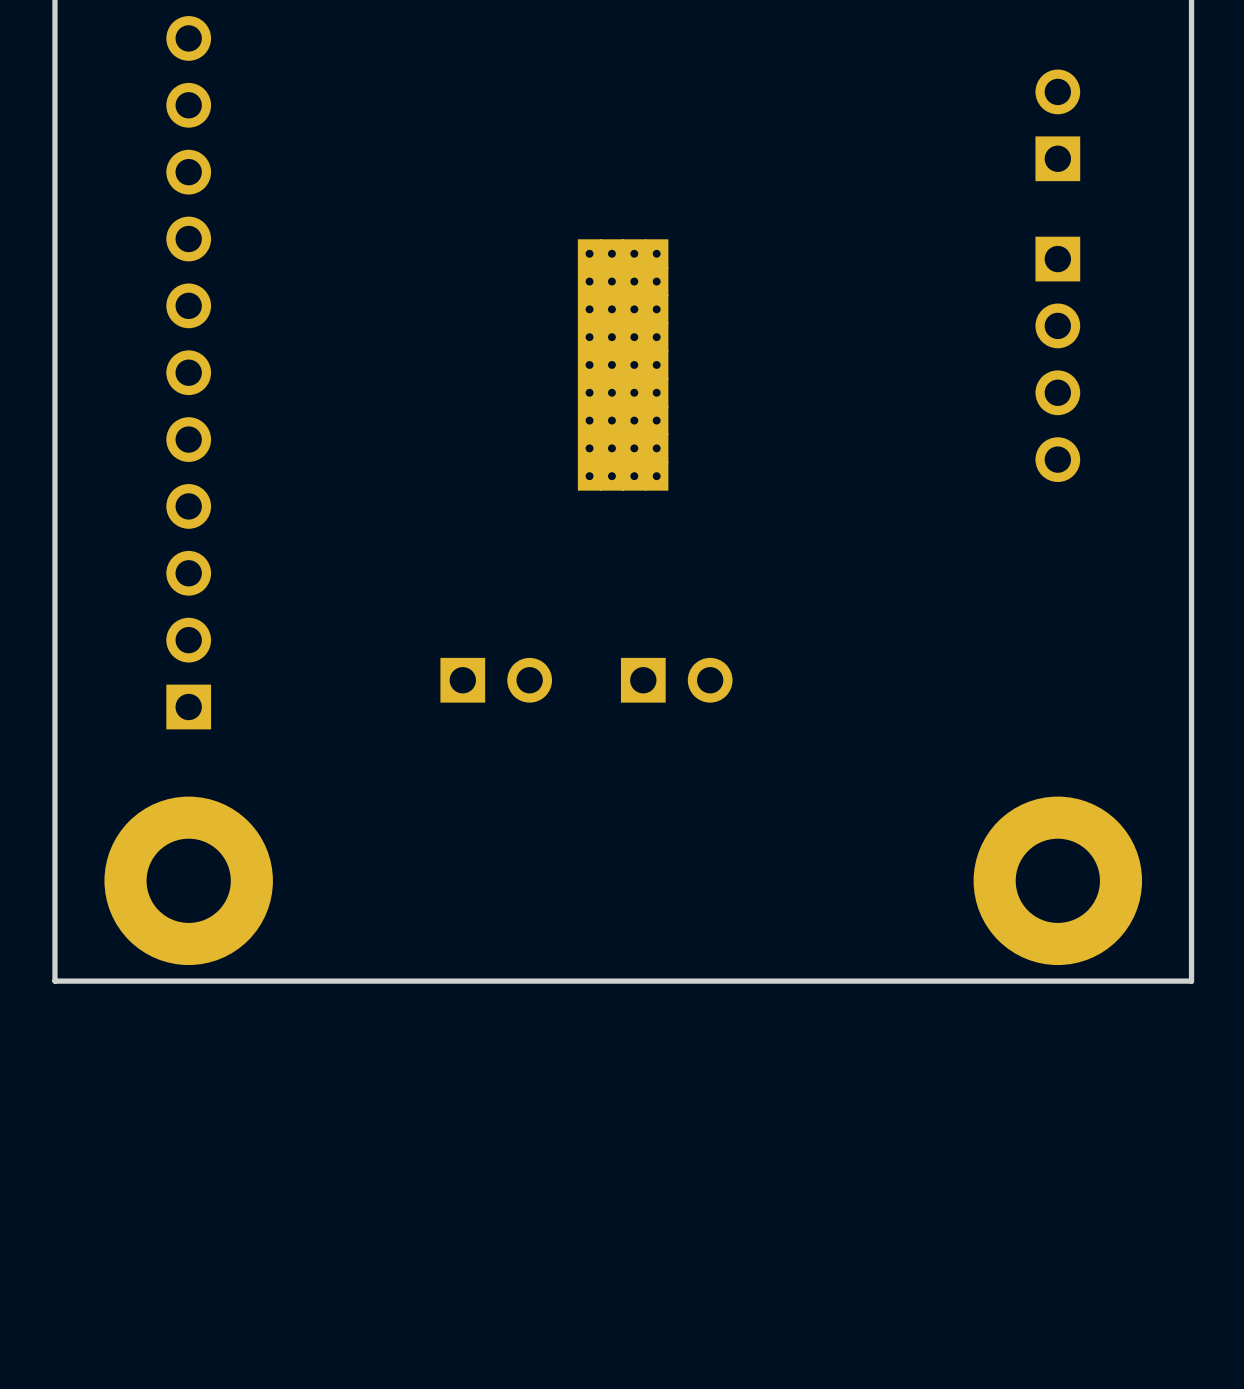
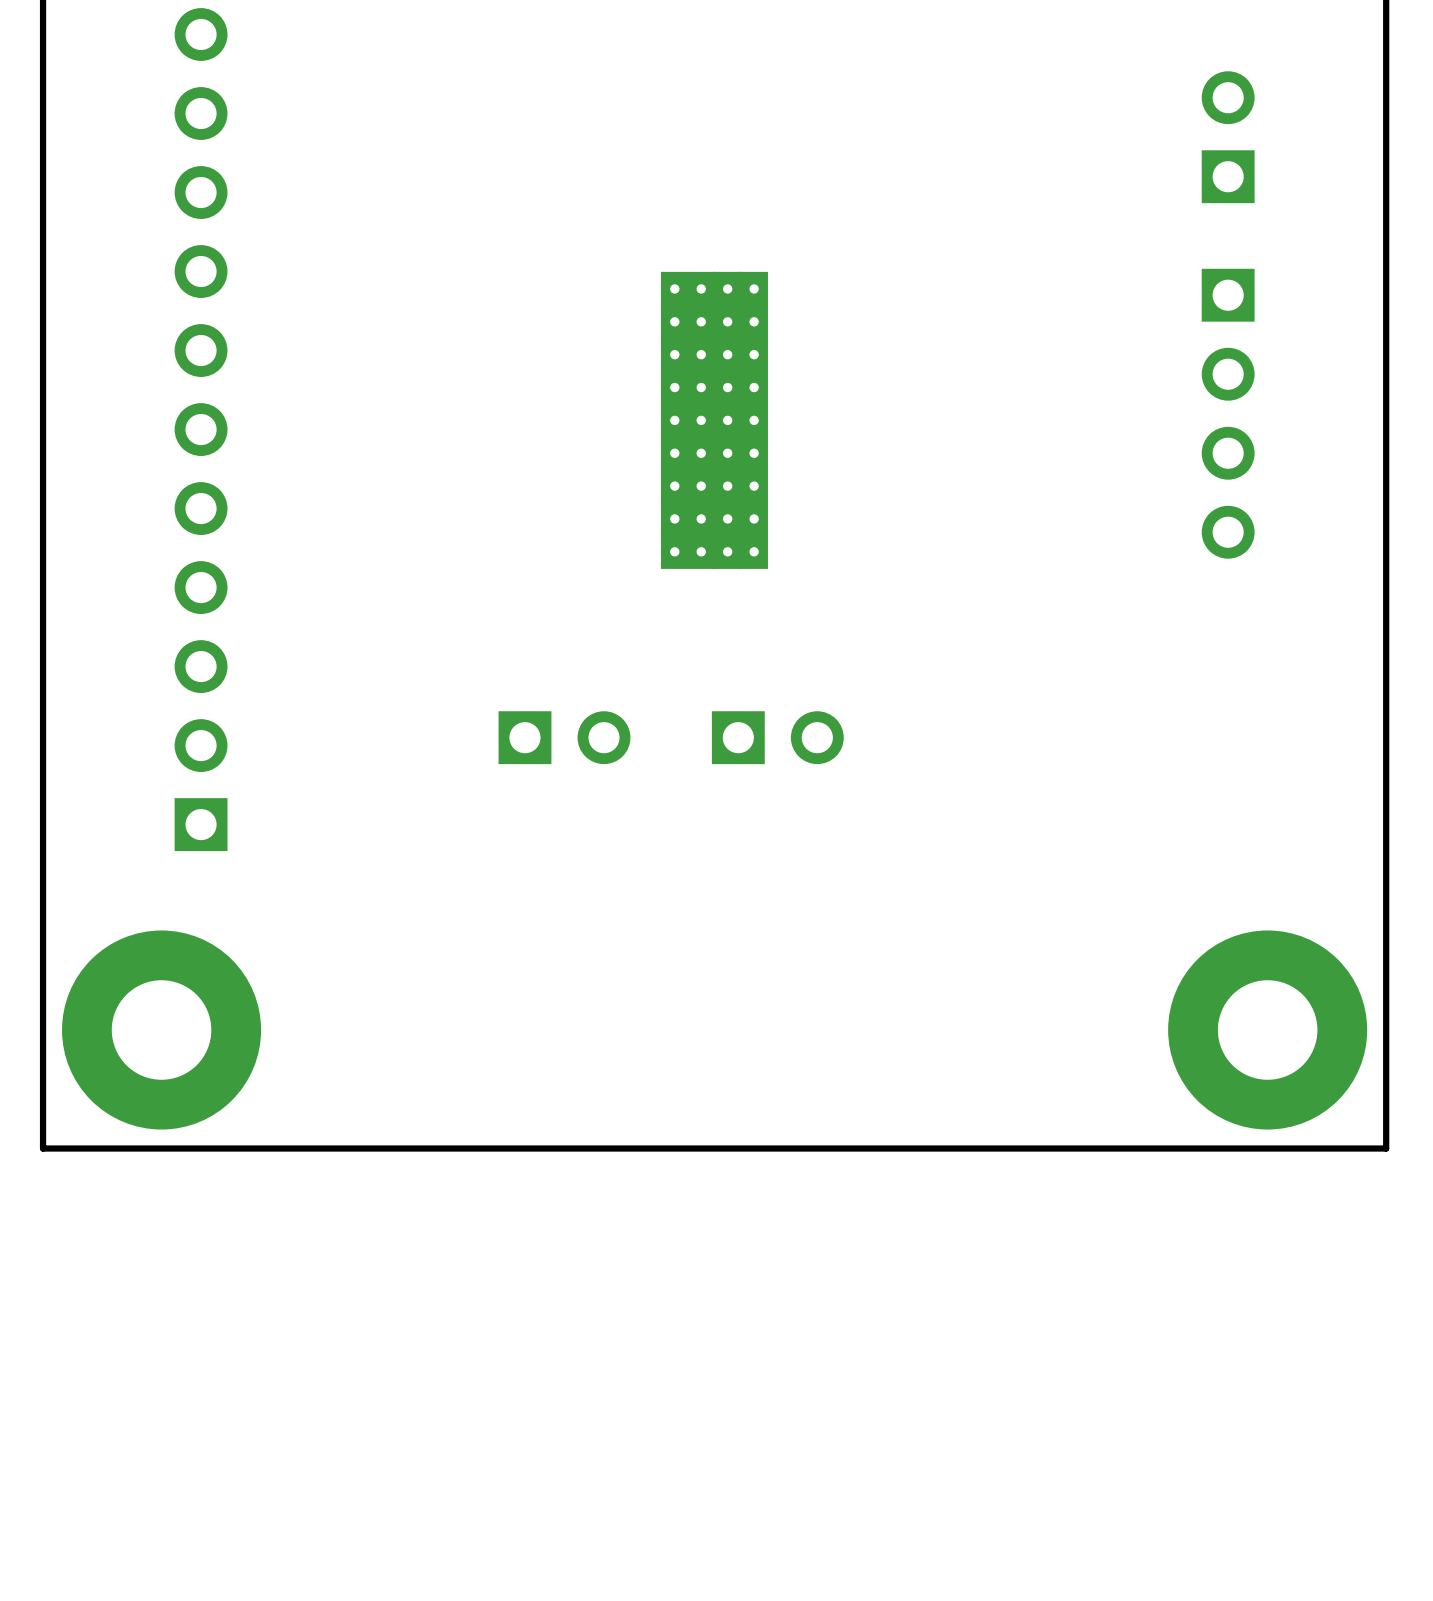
part position: (496, 680) -> (564, 737)
part position: (676, 680) -> (777, 737)
part position: (188, 880) -> (161, 1030)
part position: (1057, 880) -> (1267, 1030)

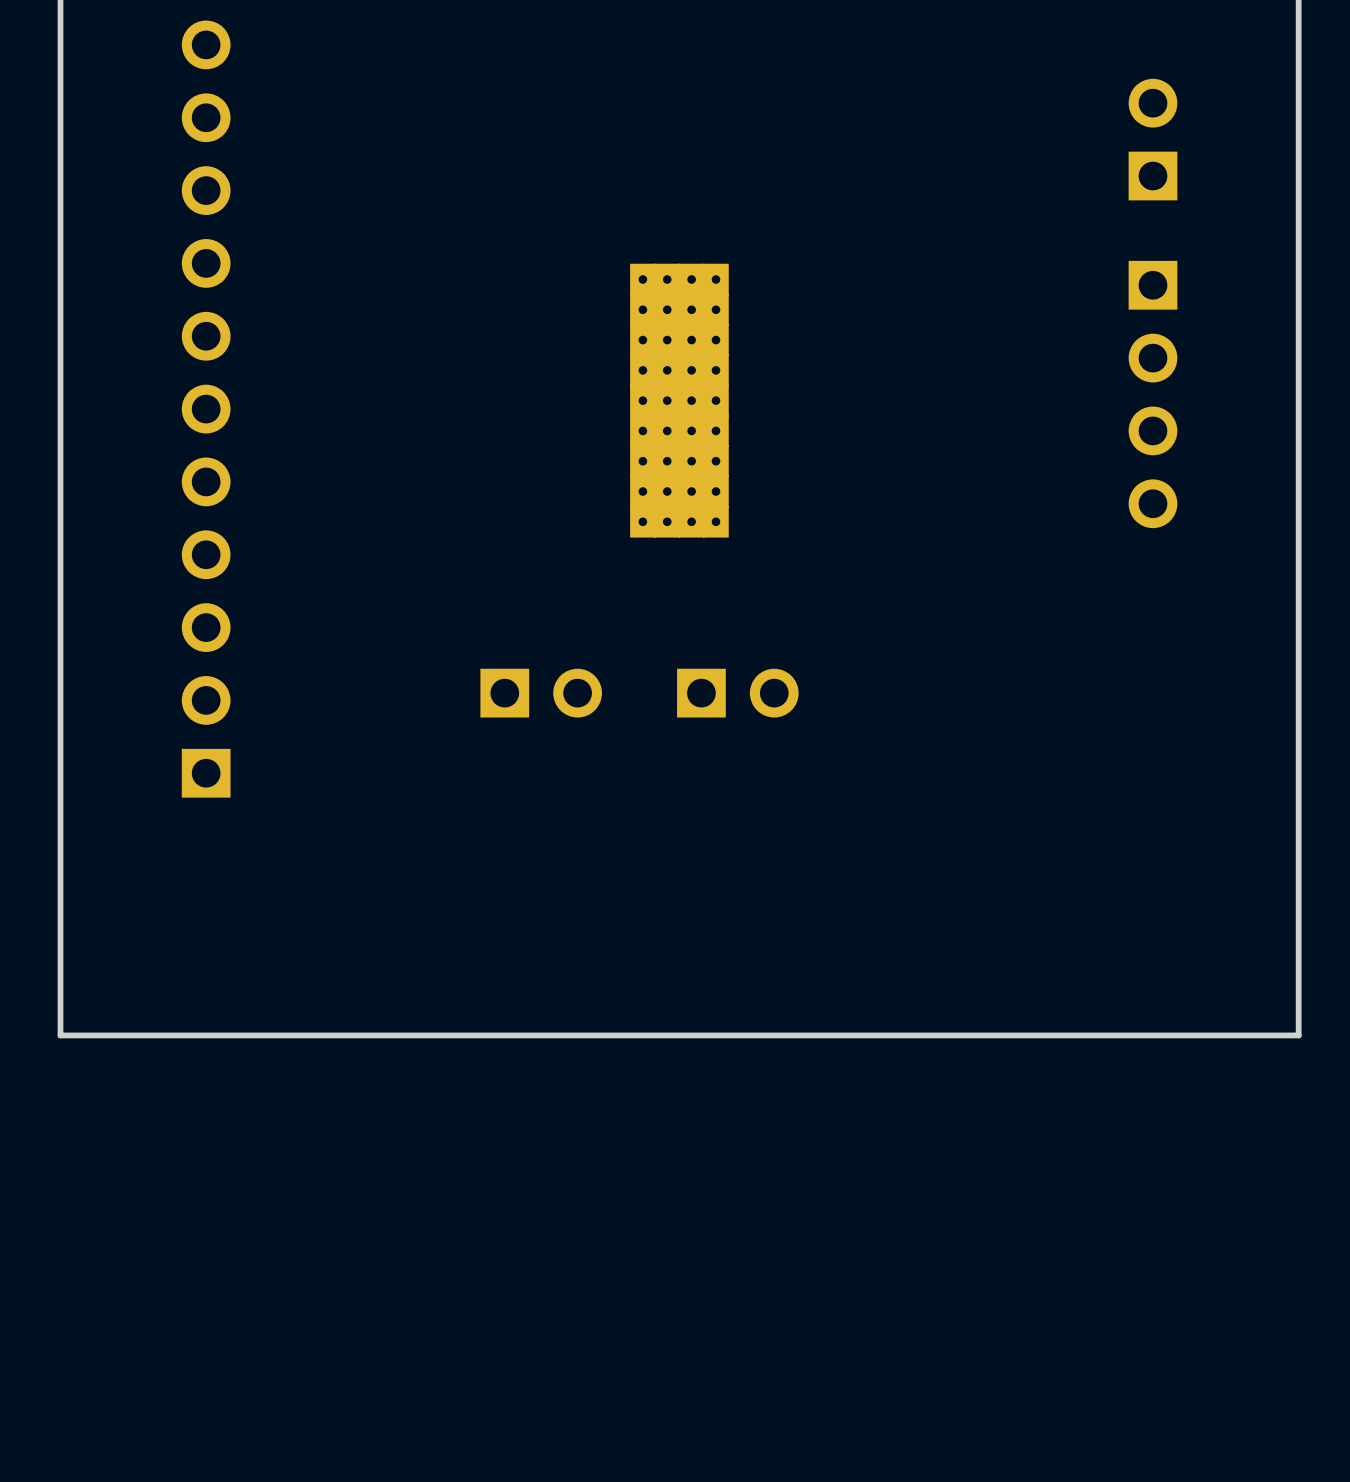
part: (161, 1030) -> none
part: (1267, 1030) -> none
board edge: (1386, 1109) (1386, 1148) (43, 1148) (43, 1109) -> (1298, 1035) (60, 1035)

